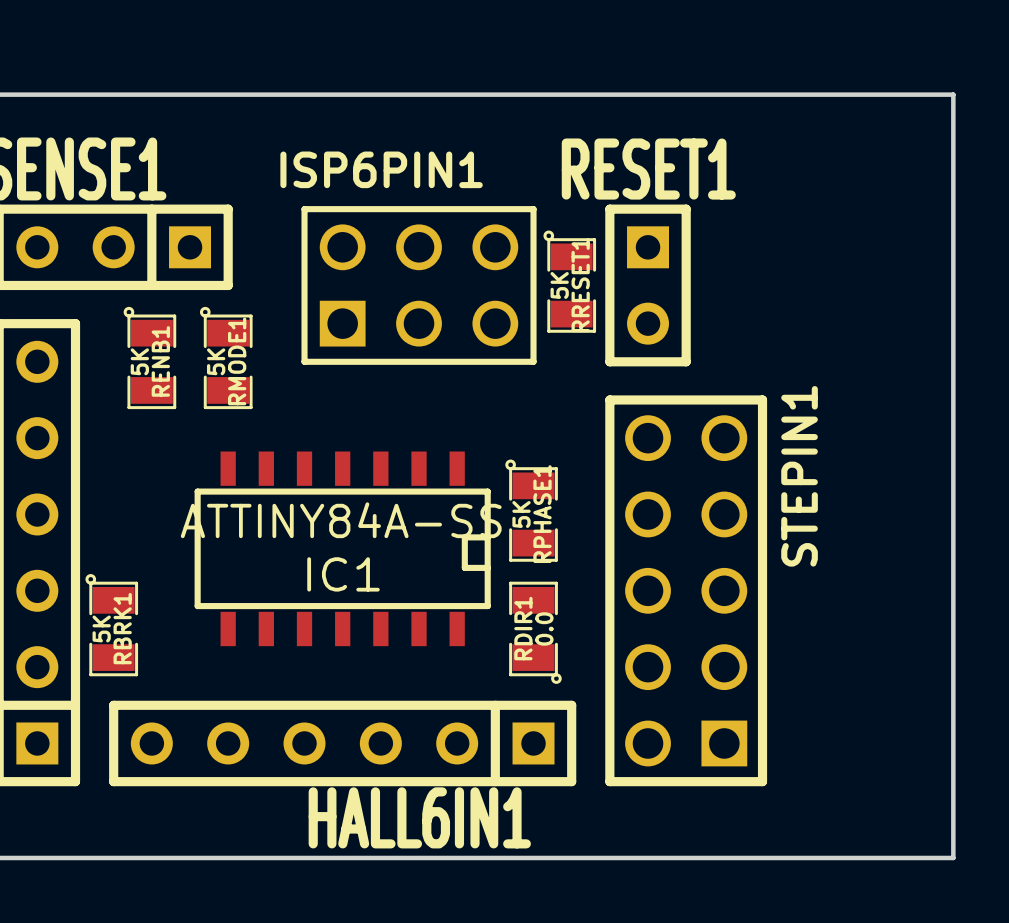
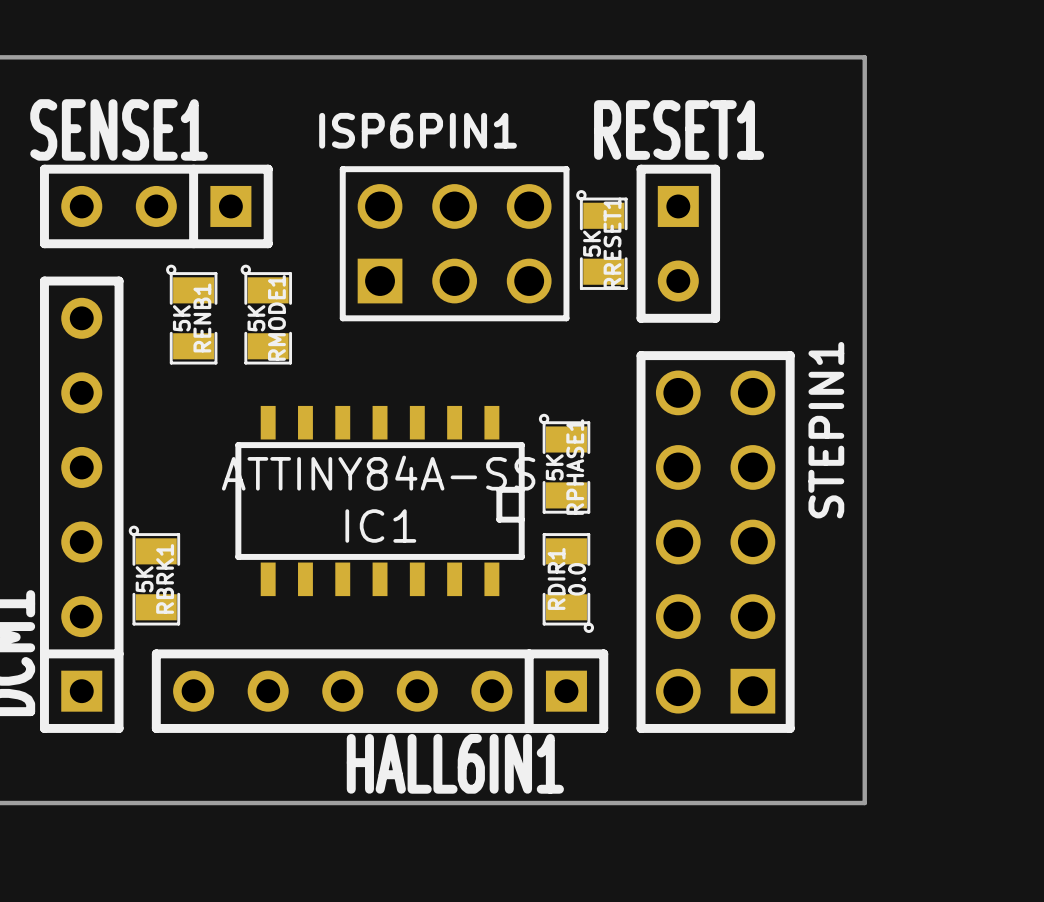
board edge: (838, 94) (953, 94) (953, 857) (838, 857) -> (864, 57) (864, 803)

